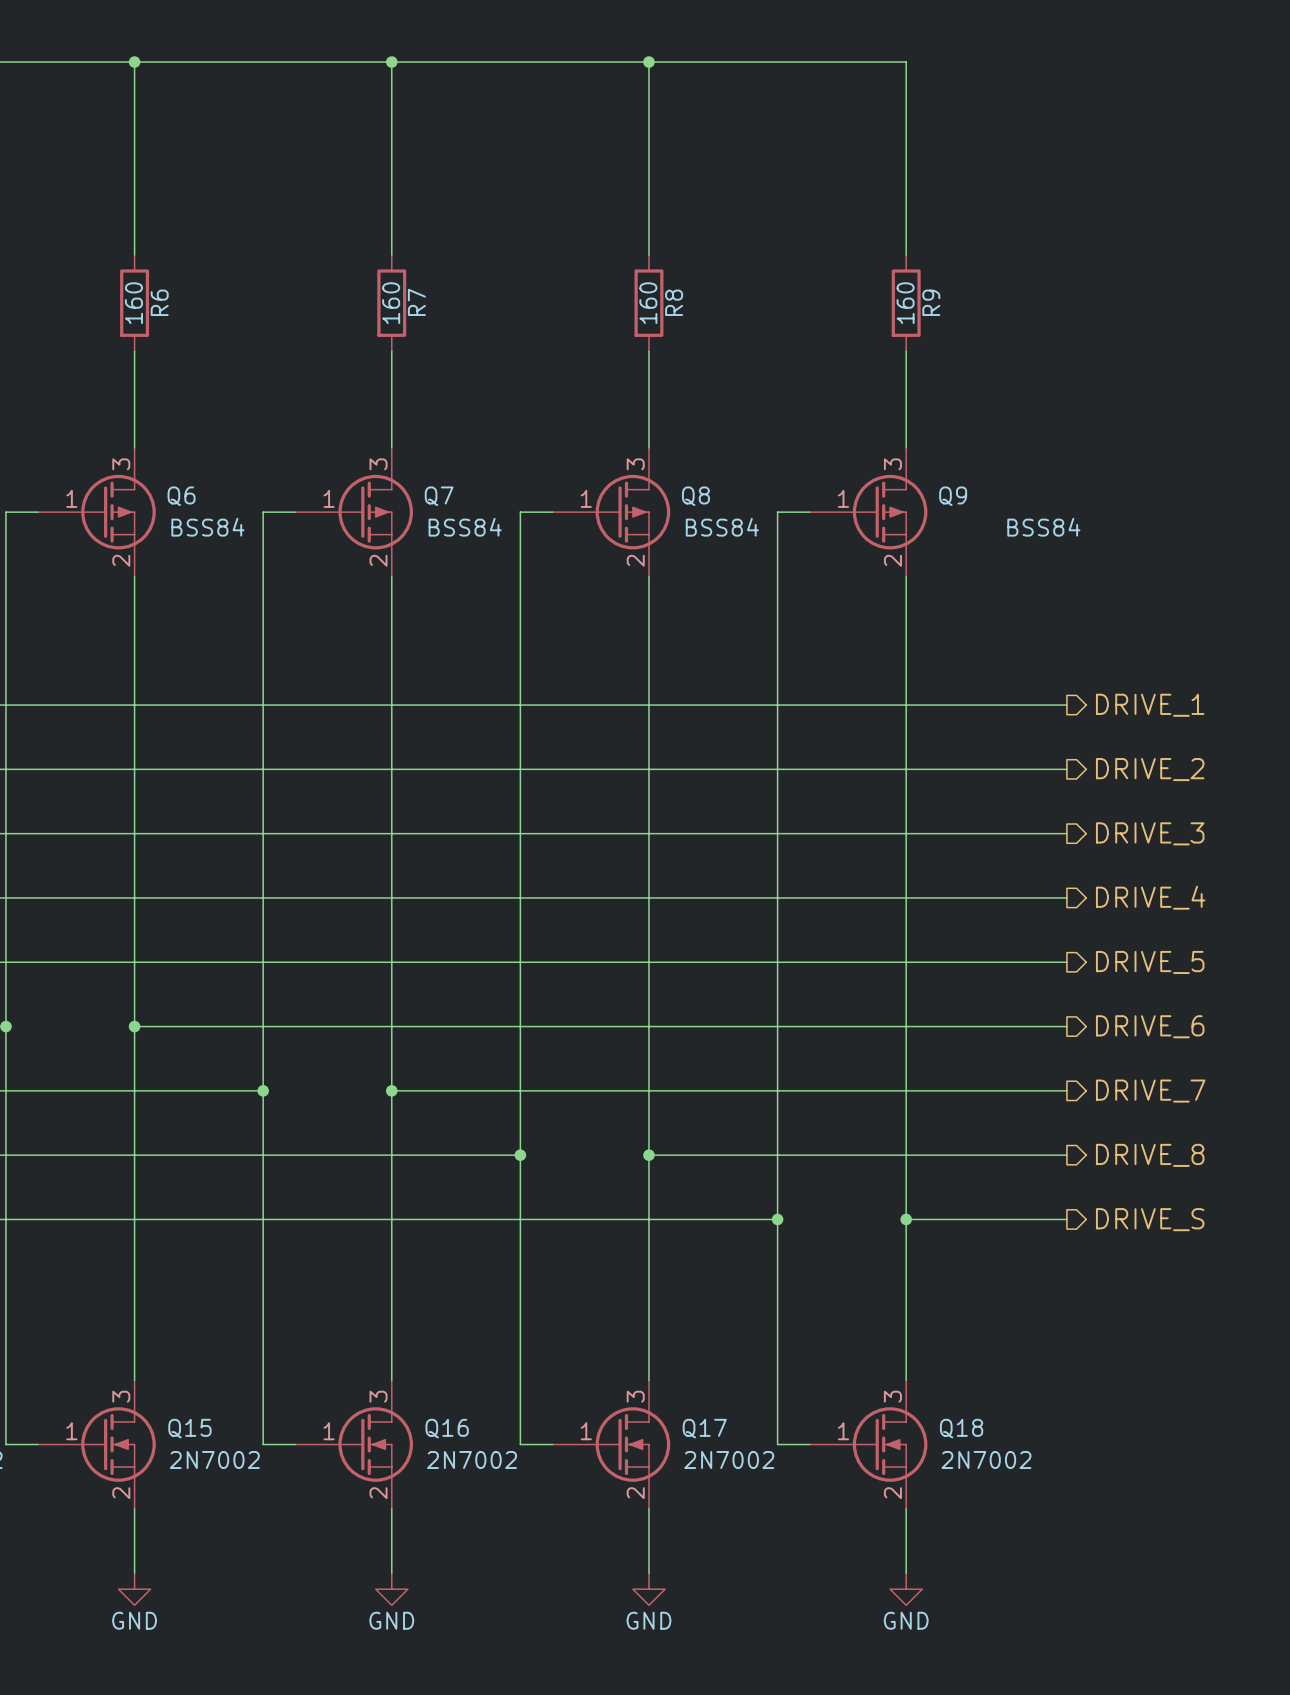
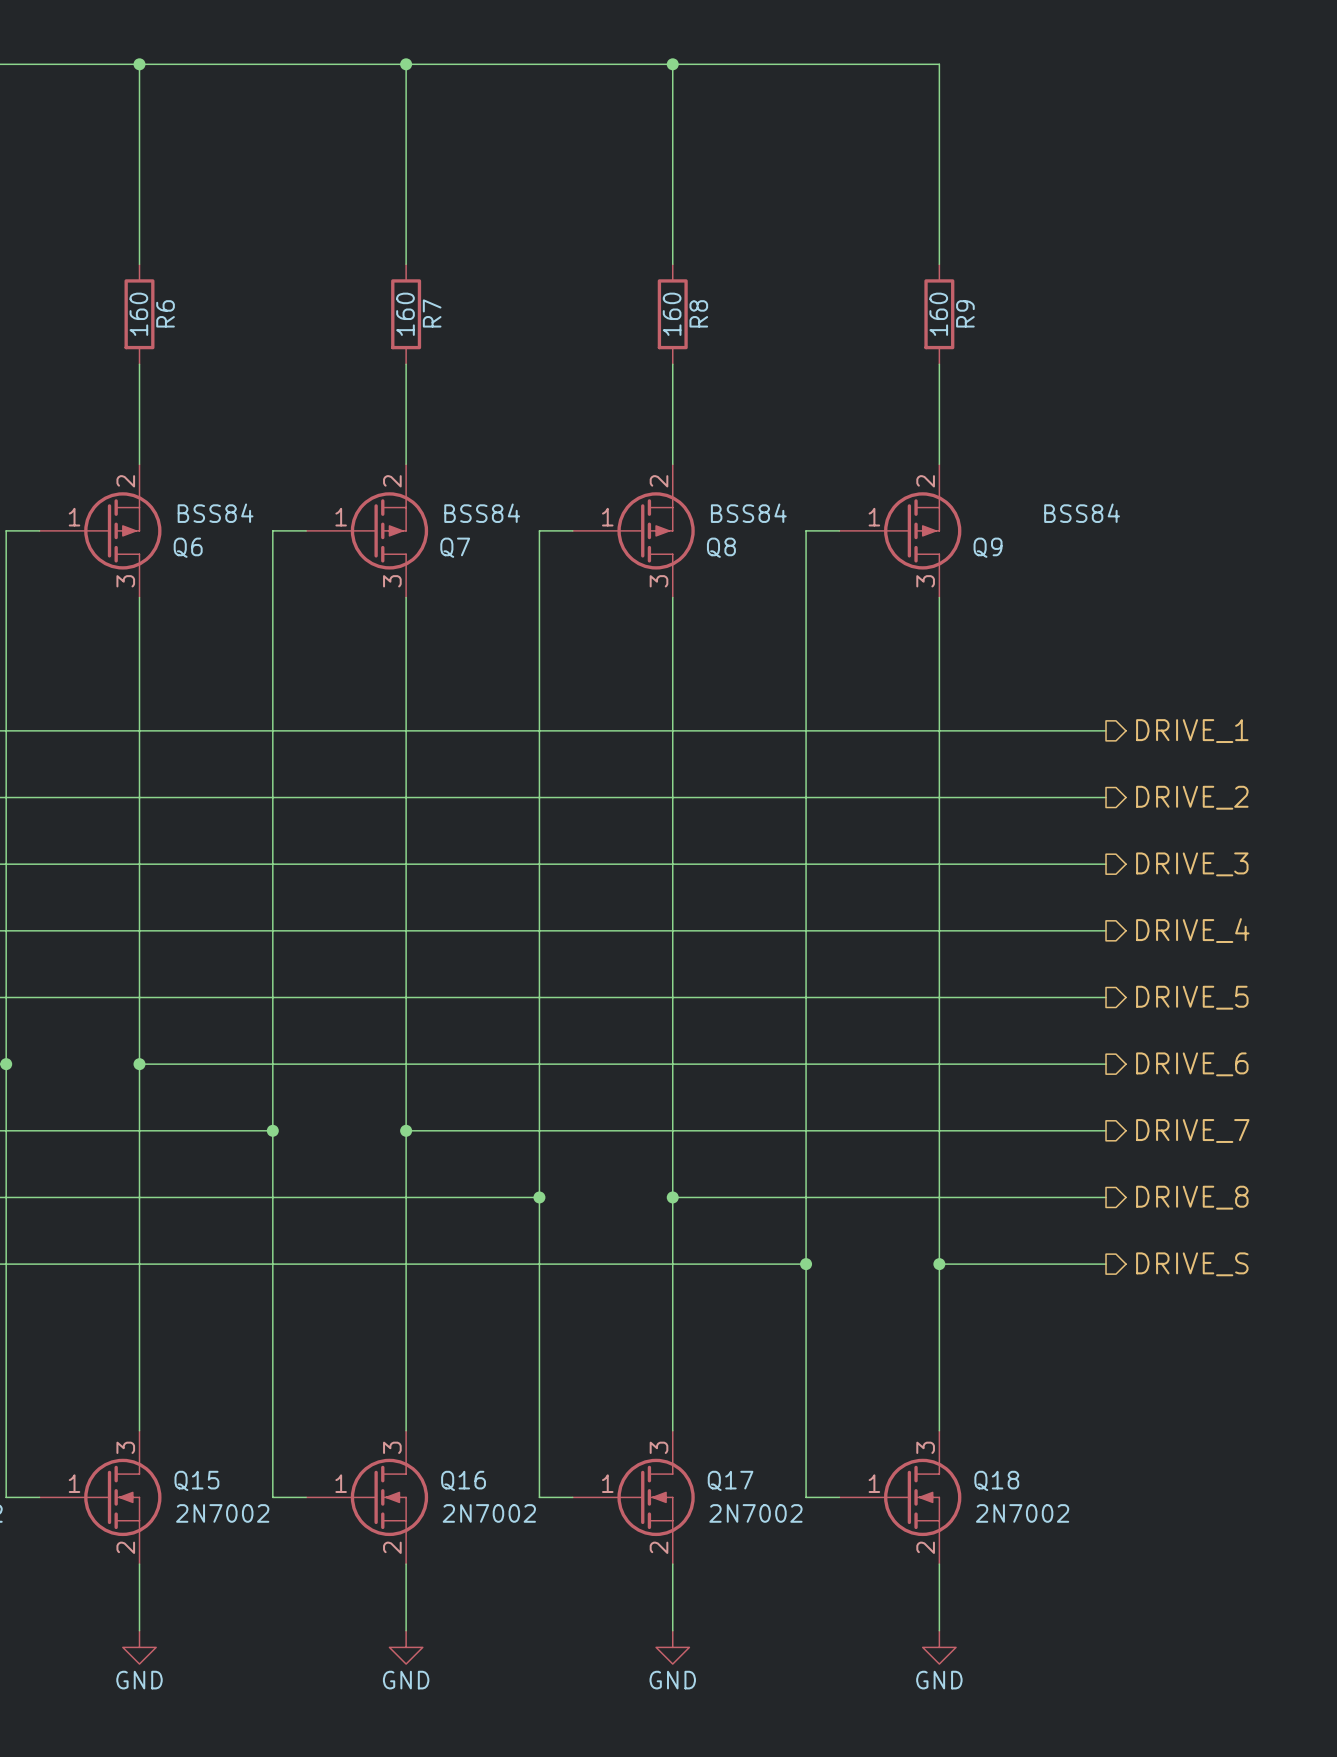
Q6 flip: as is (118, 512) -> up-down (122, 530)
Q7 flip: as is (375, 512) -> up-down (389, 530)
Q8 flip: as is (632, 512) -> up-down (656, 530)
Q9 flip: as is (890, 512) -> up-down (922, 530)

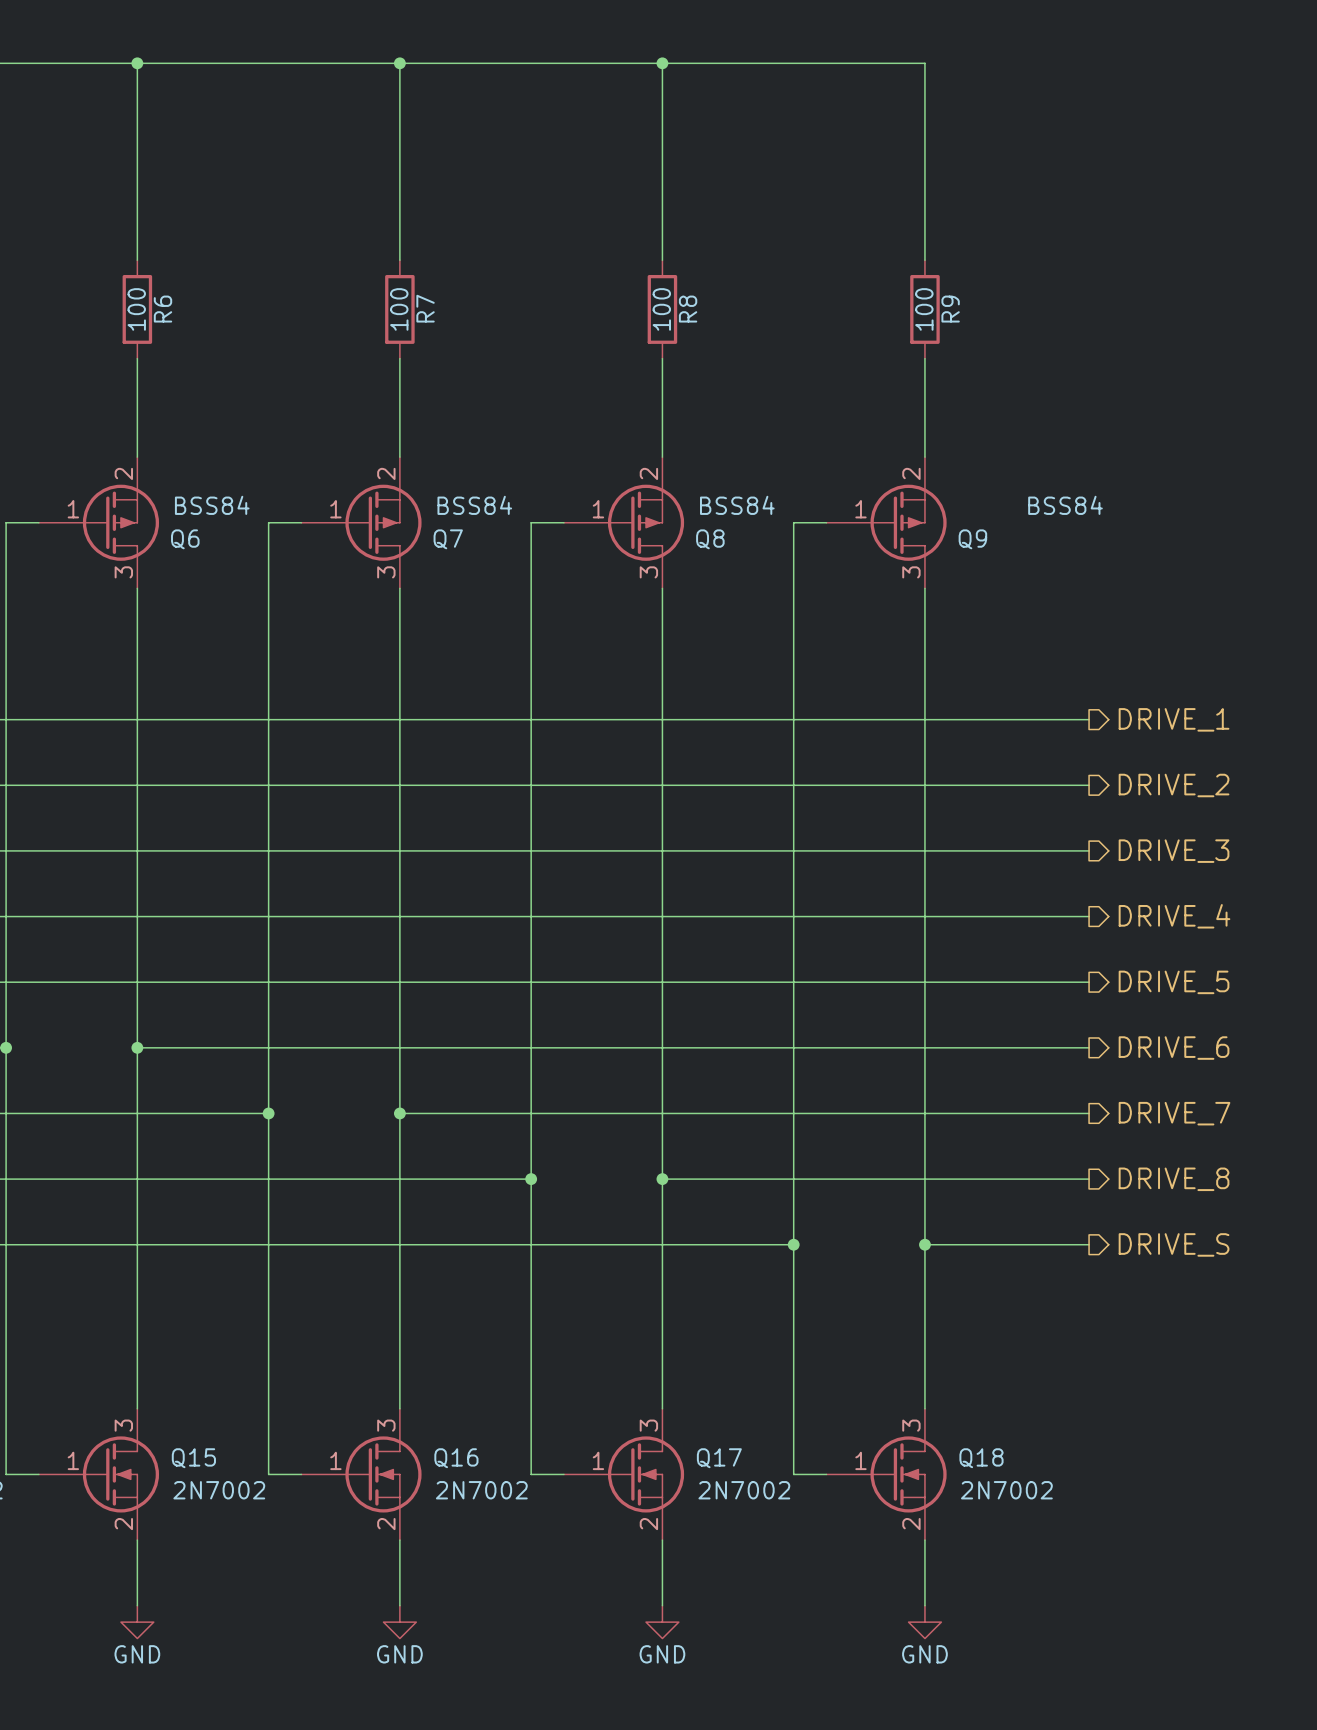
R6 value: 160 (138, 314) -> 100 (136, 309)
R7 value: 160 (405, 314) -> 100 (399, 309)
R8 value: 160 (672, 314) -> 100 (661, 309)
R9 value: 160 (938, 314) -> 100 (924, 309)

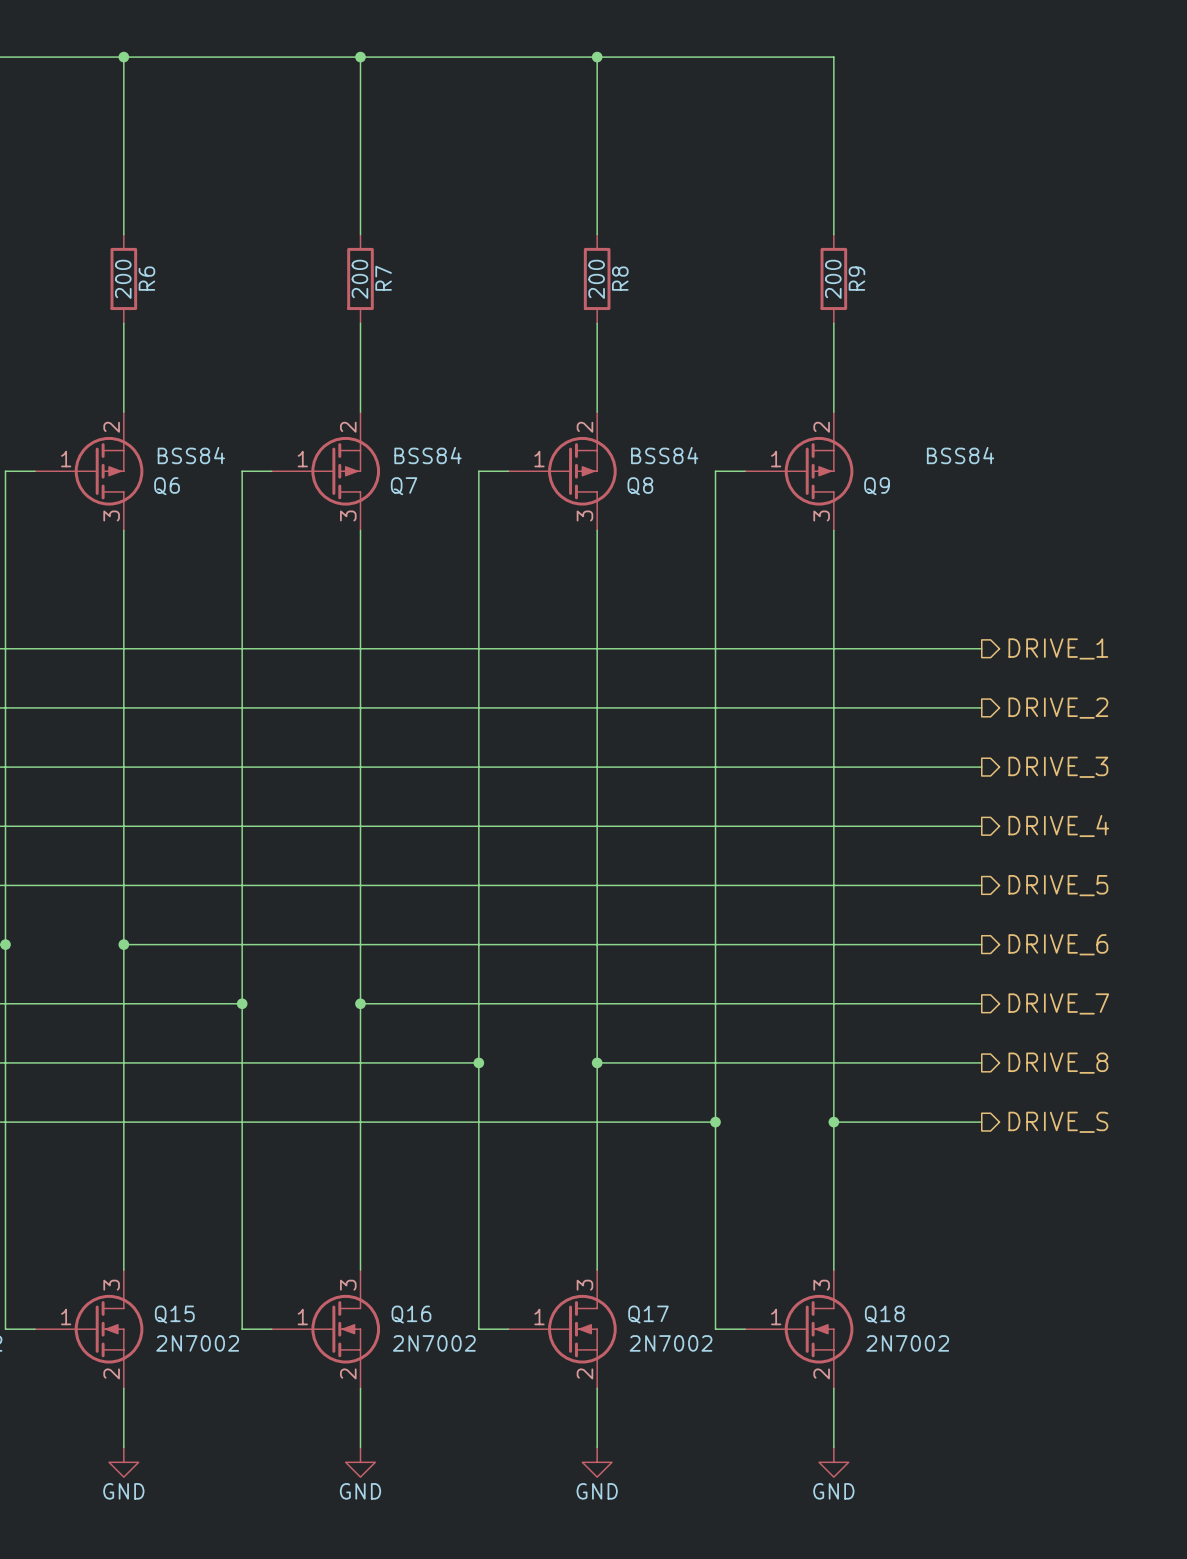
R6 value: 100 (136, 309) -> 200 (123, 279)
R7 value: 100 (399, 309) -> 200 (359, 279)
R8 value: 100 (661, 309) -> 200 (596, 279)
R9 value: 100 (924, 309) -> 200 (833, 279)

